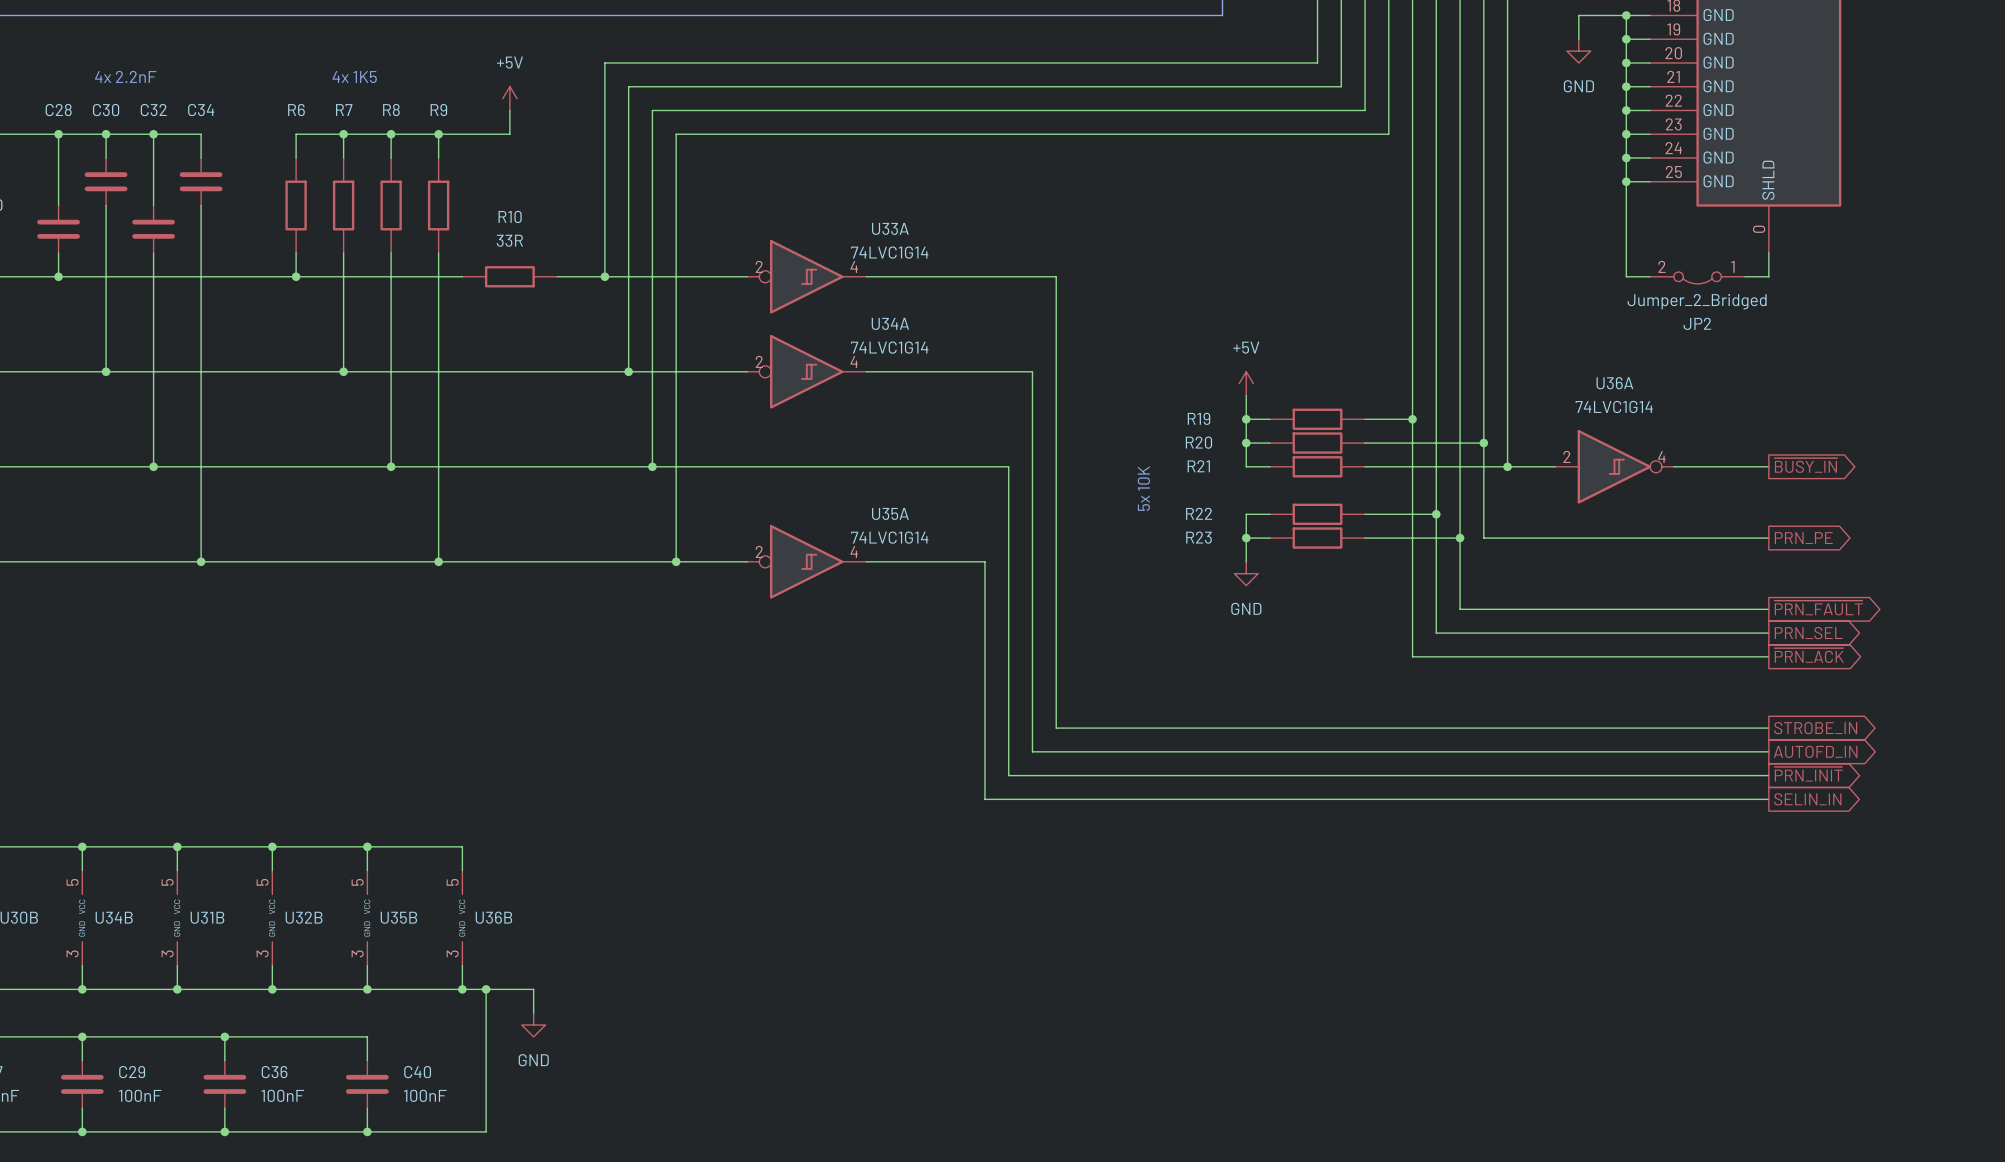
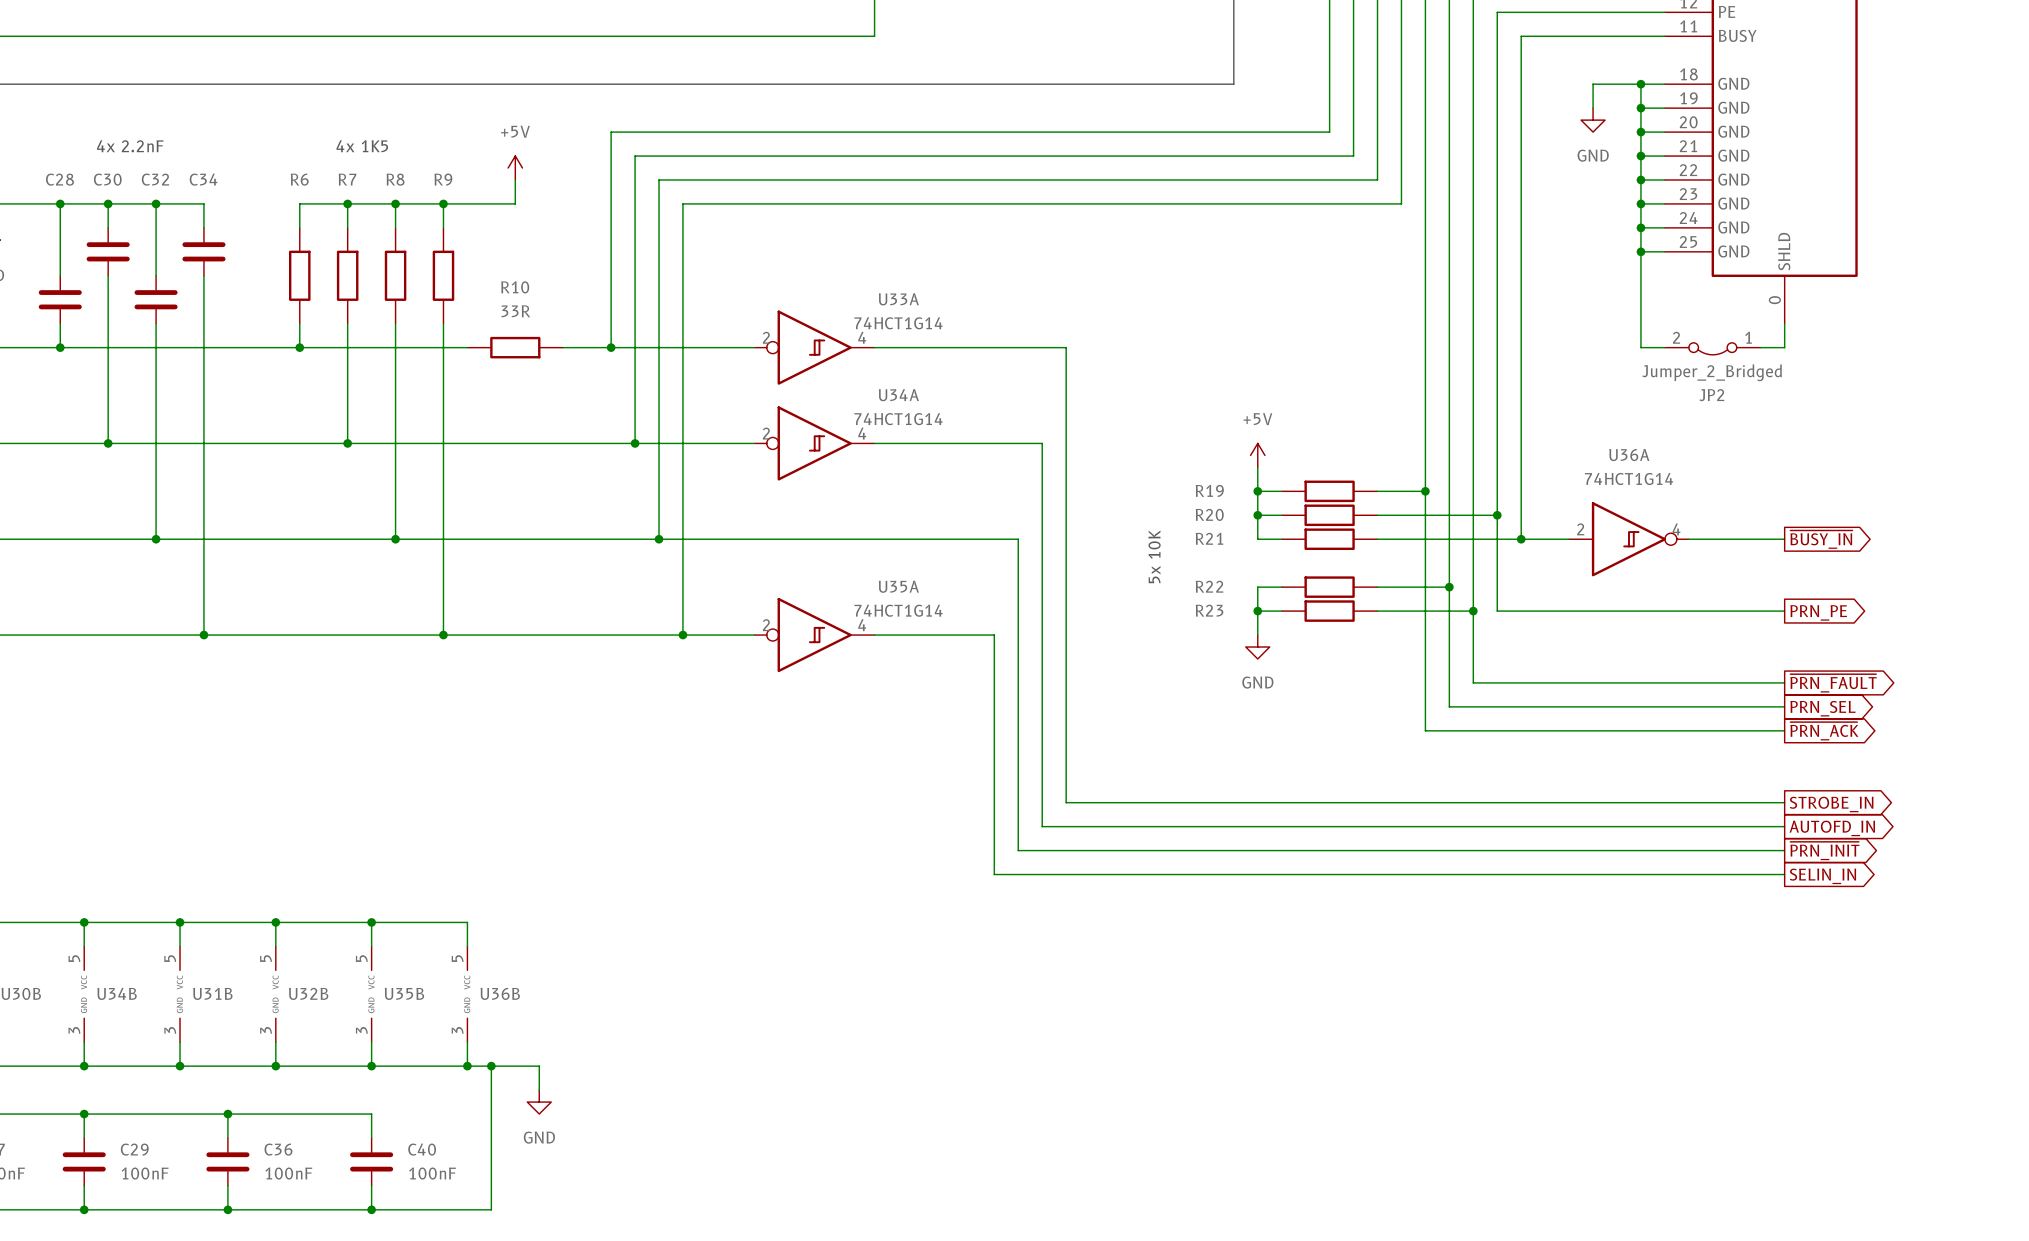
U33A value: 74LVC1G14 (889, 252) -> 74HCT1G14 (898, 323)
U34A value: 74LVC1G14 (889, 347) -> 74HCT1G14 (898, 419)
U36A value: 74LVC1G14 (1614, 406) -> 74HCT1G14 (1628, 478)
U35A value: 74LVC1G14 (889, 537) -> 74HCT1G14 (898, 610)

